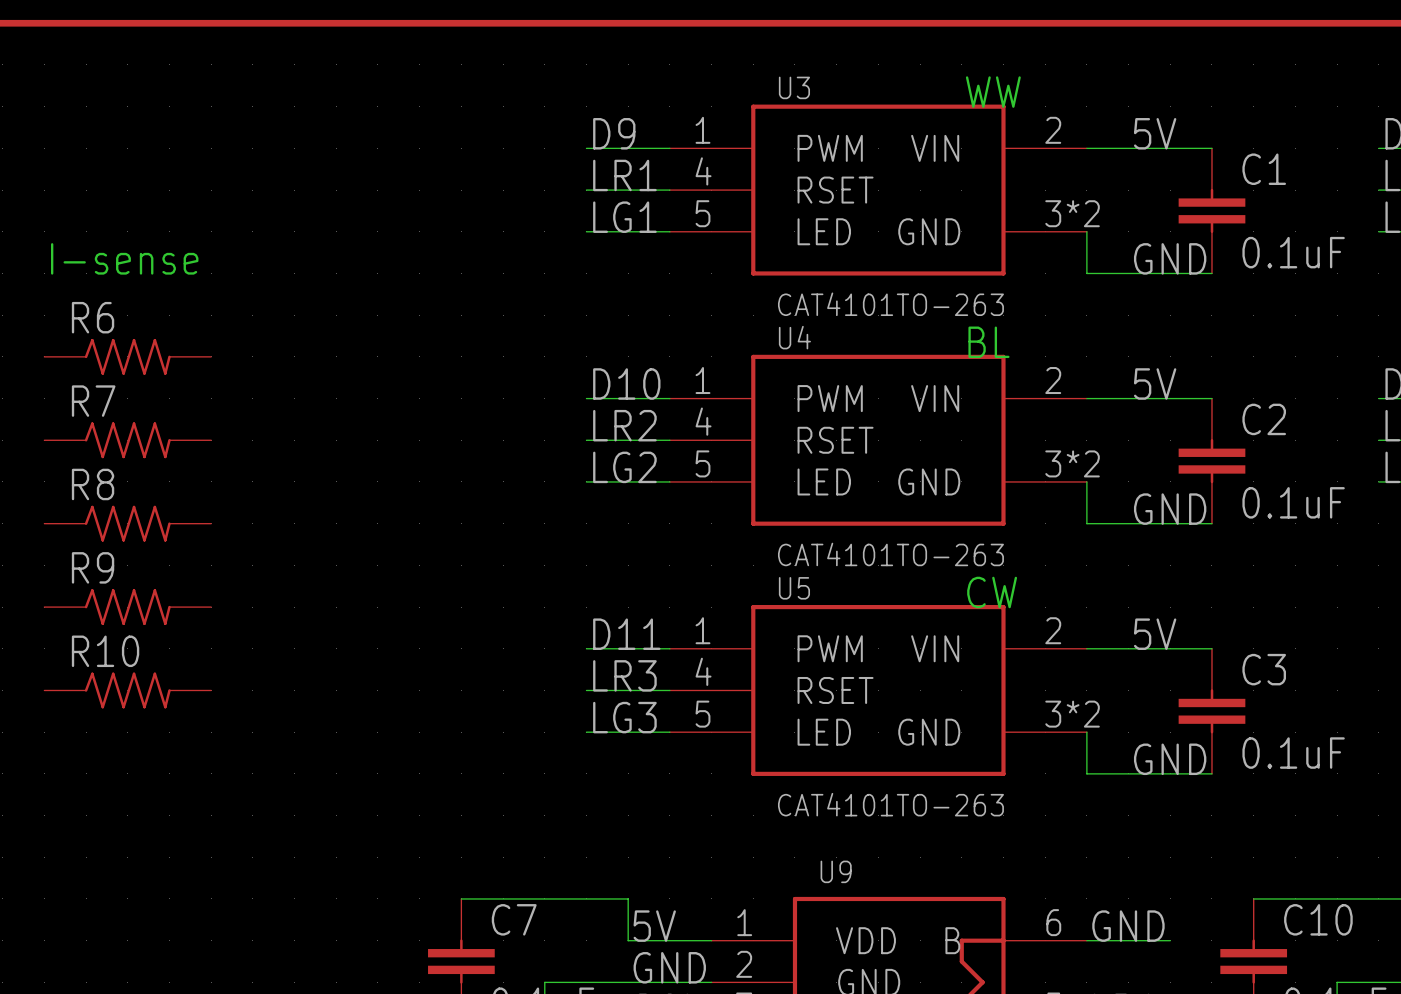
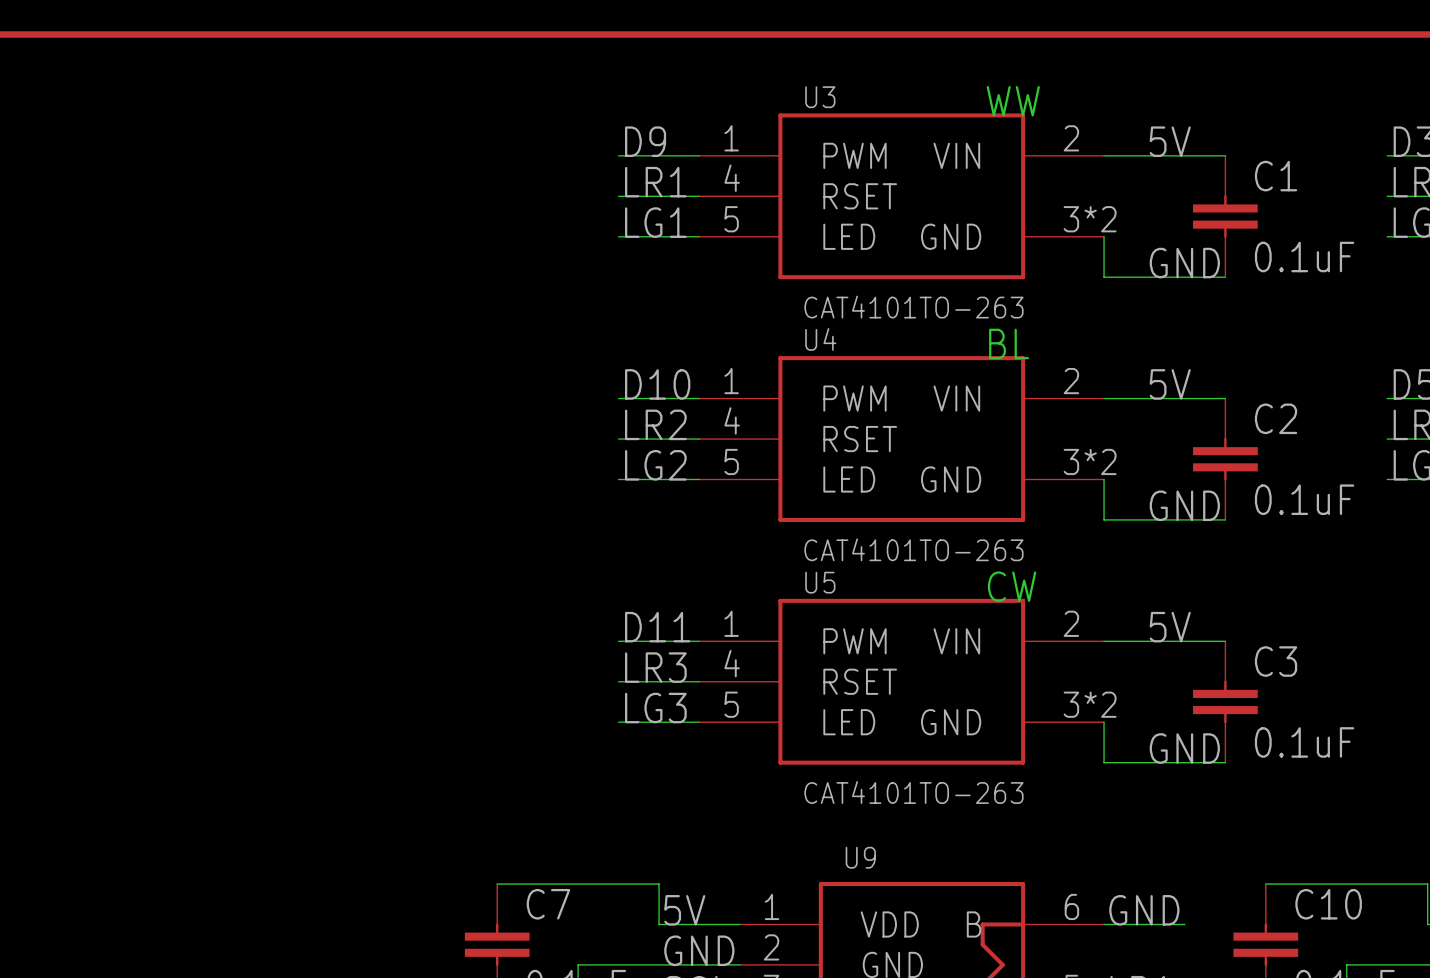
text: I-sense (124, 258) -> none
R6: (127, 356) -> none
R7: (127, 440) -> none
R8: (127, 523) -> none
R9: (127, 607) -> none
R10: (127, 690) -> none

